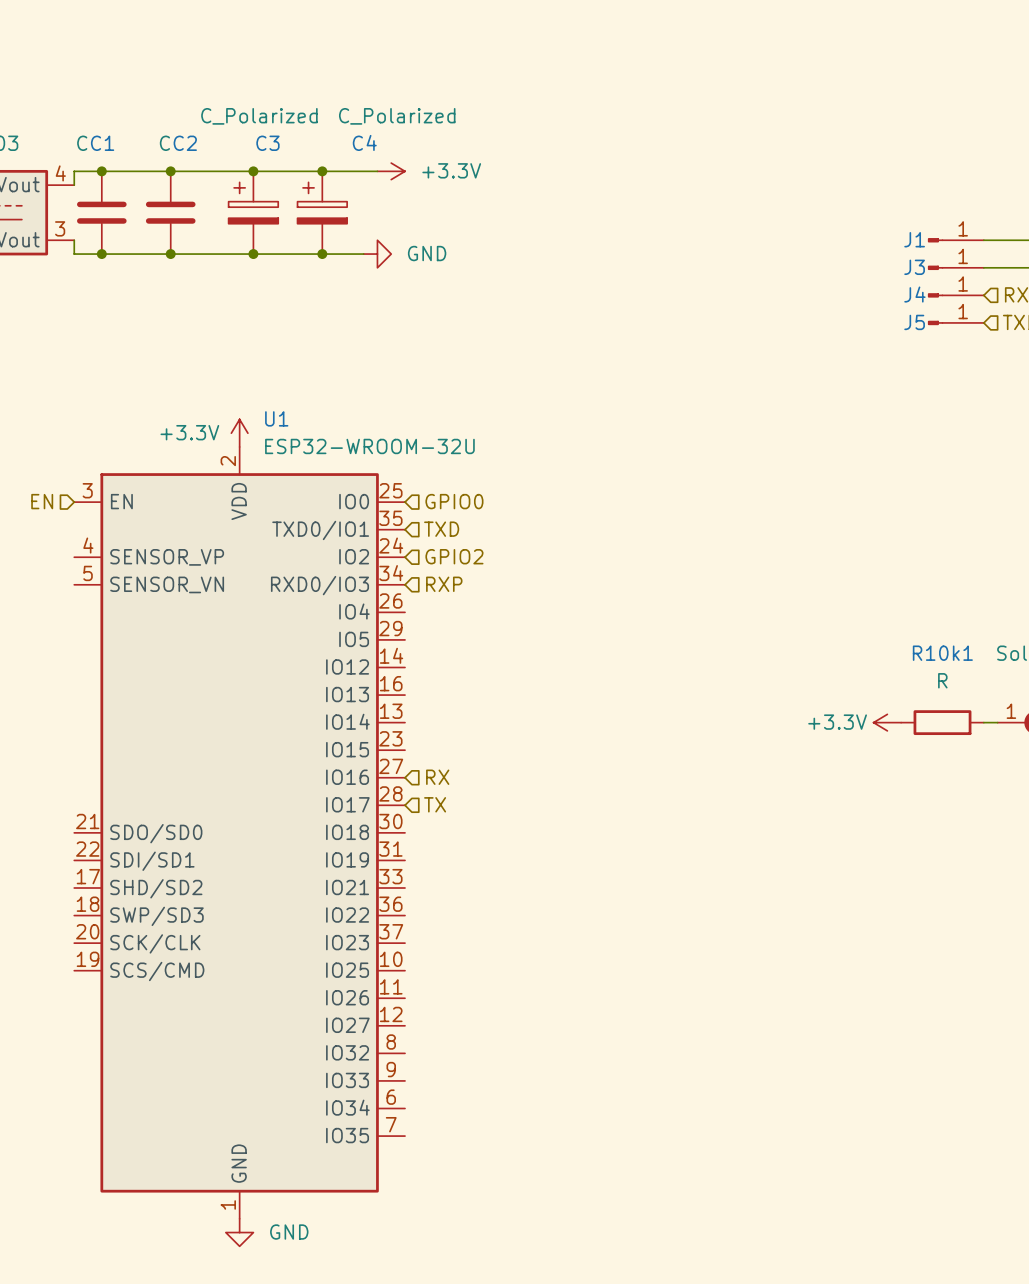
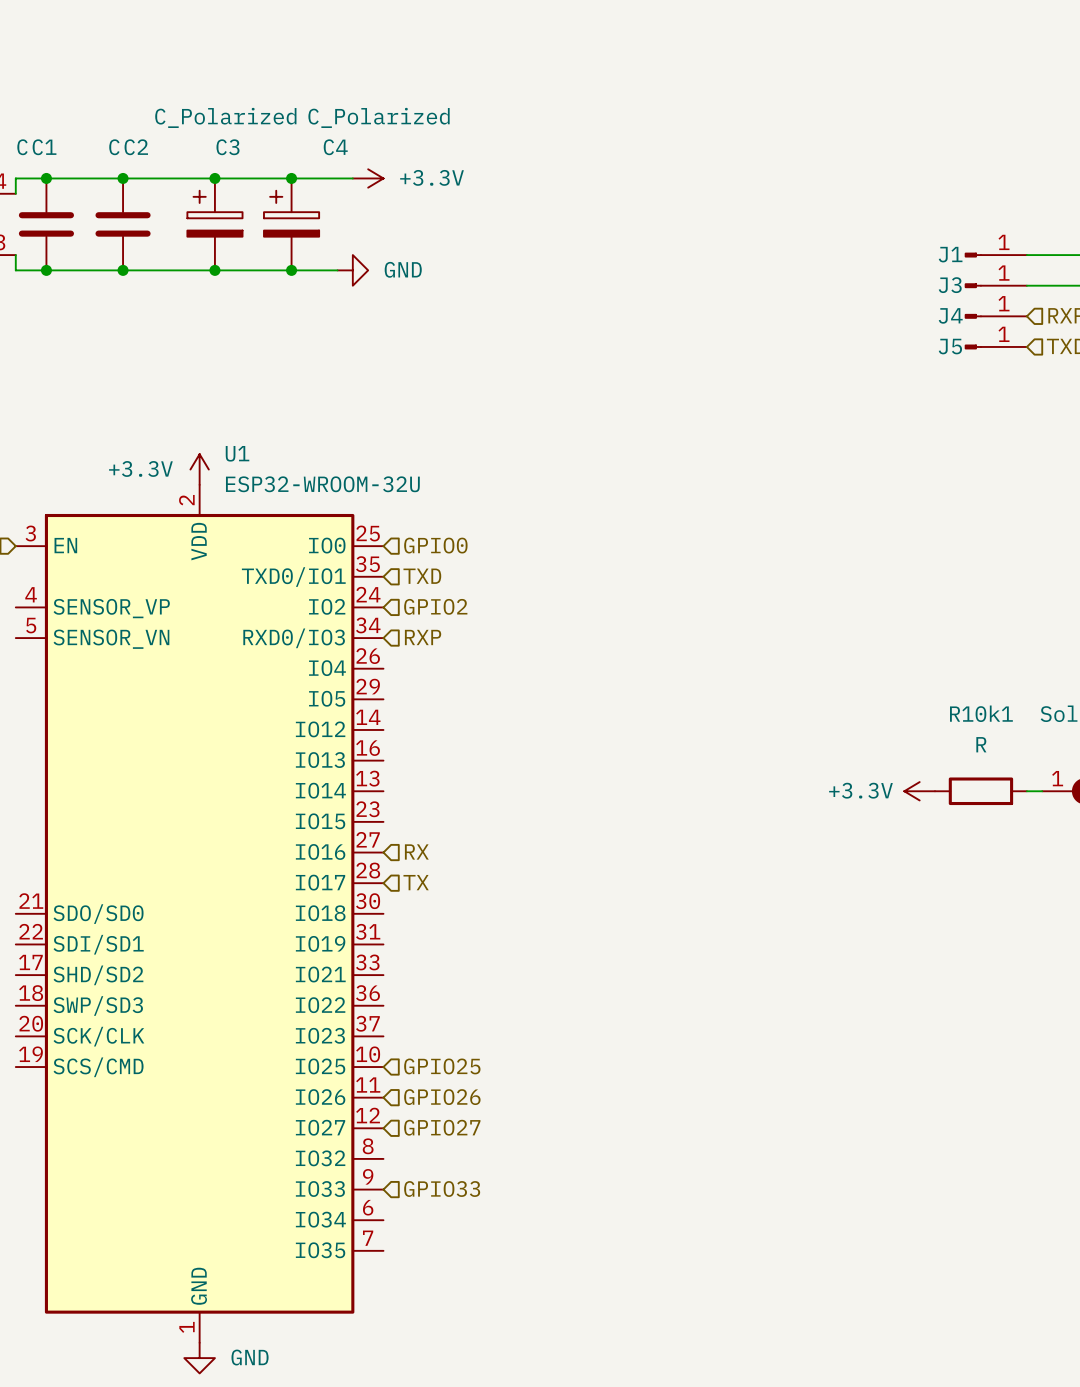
hierarchical label: none -> GPIO25 (442, 1066)
hierarchical label: none -> GPIO26 (442, 1097)
hierarchical label: none -> GPIO27 (442, 1127)
hierarchical label: none -> GPIO33 (442, 1189)

